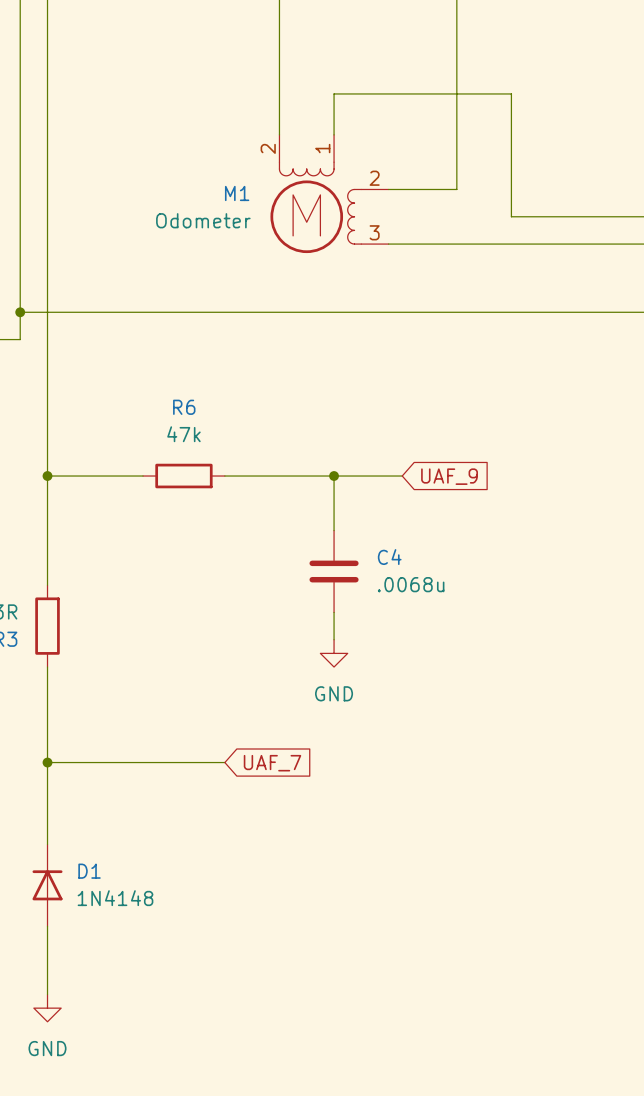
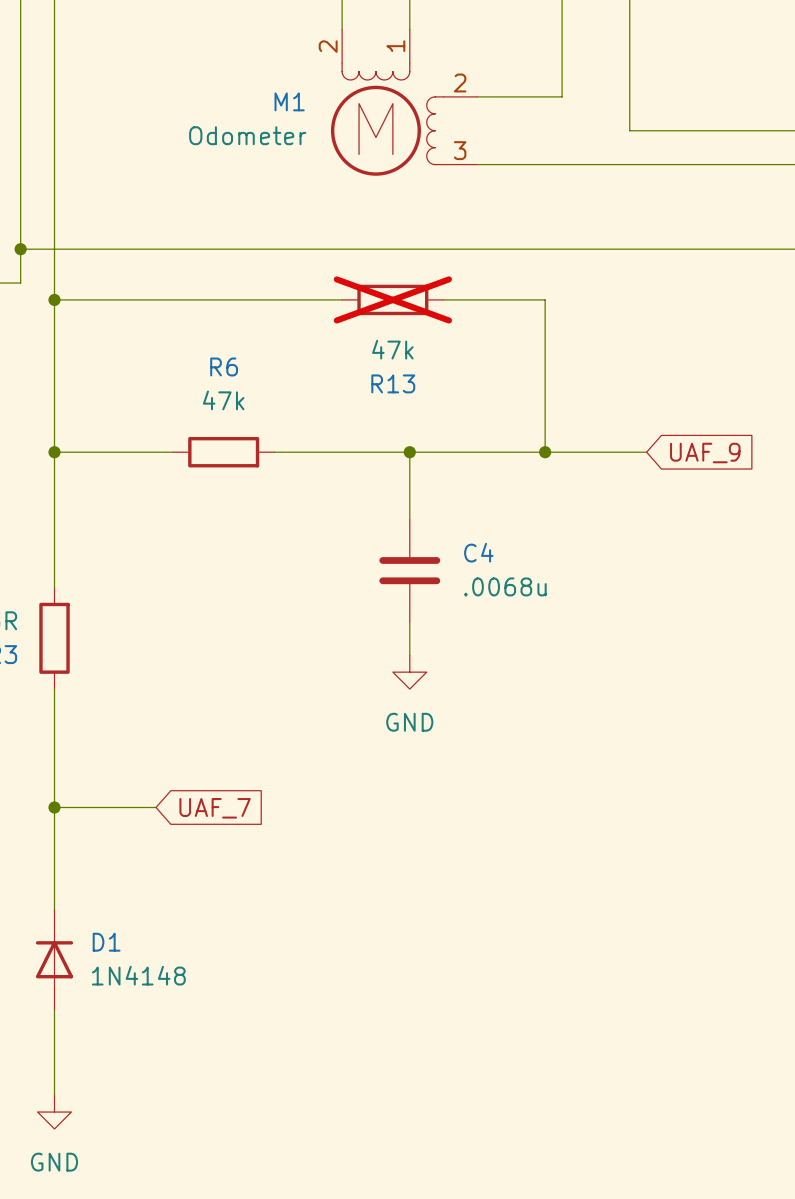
wire: none -> (54, 299) (342, 299)
junction: none -> (54, 299)
R13: none -> 47k (392, 299)
wire: none -> (443, 299) (545, 299) (545, 452)
wire: none -> (494, 452) (646, 452)
junction: none -> (545, 452)
global label position: UAF_9 (449, 476) -> UAF_9 (705, 453)
wire: (129, 762) (224, 762) -> none
global label position: UAF_7 (272, 763) -> UAF_7 (215, 808)

